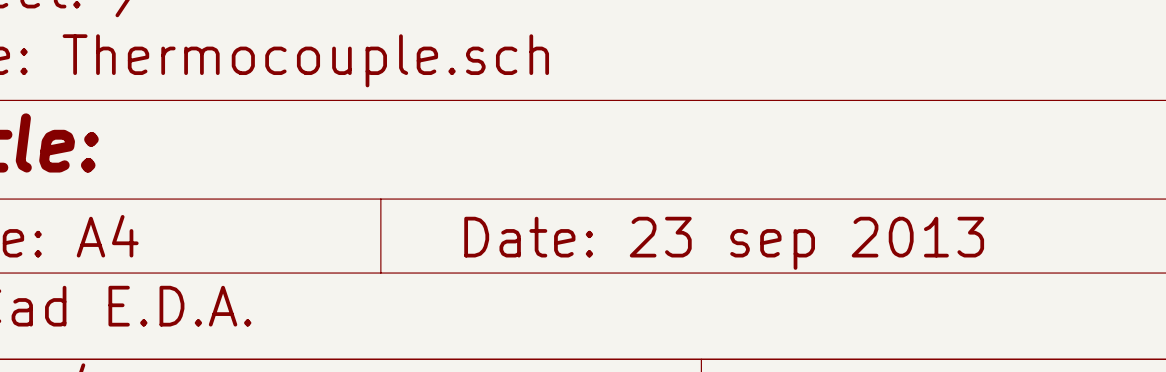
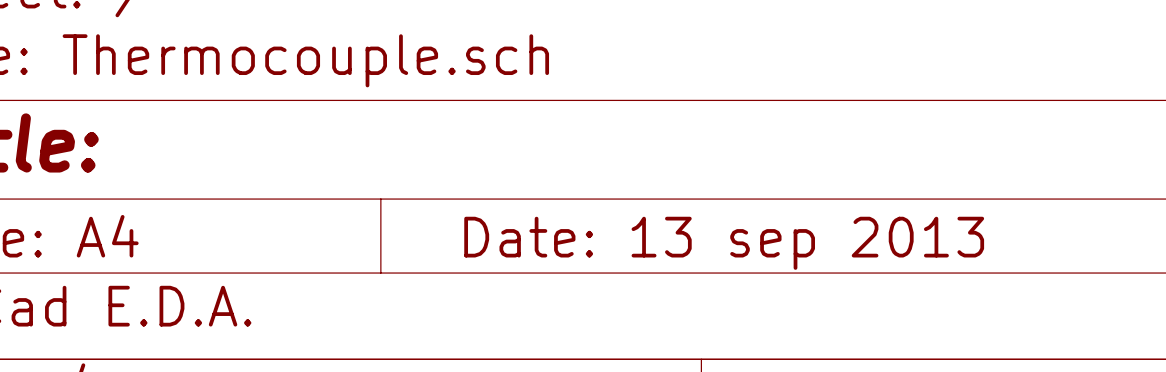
title block: Date: 23 sep 2013 (724, 243) -> Date: 13 sep 2013 (724, 243)

